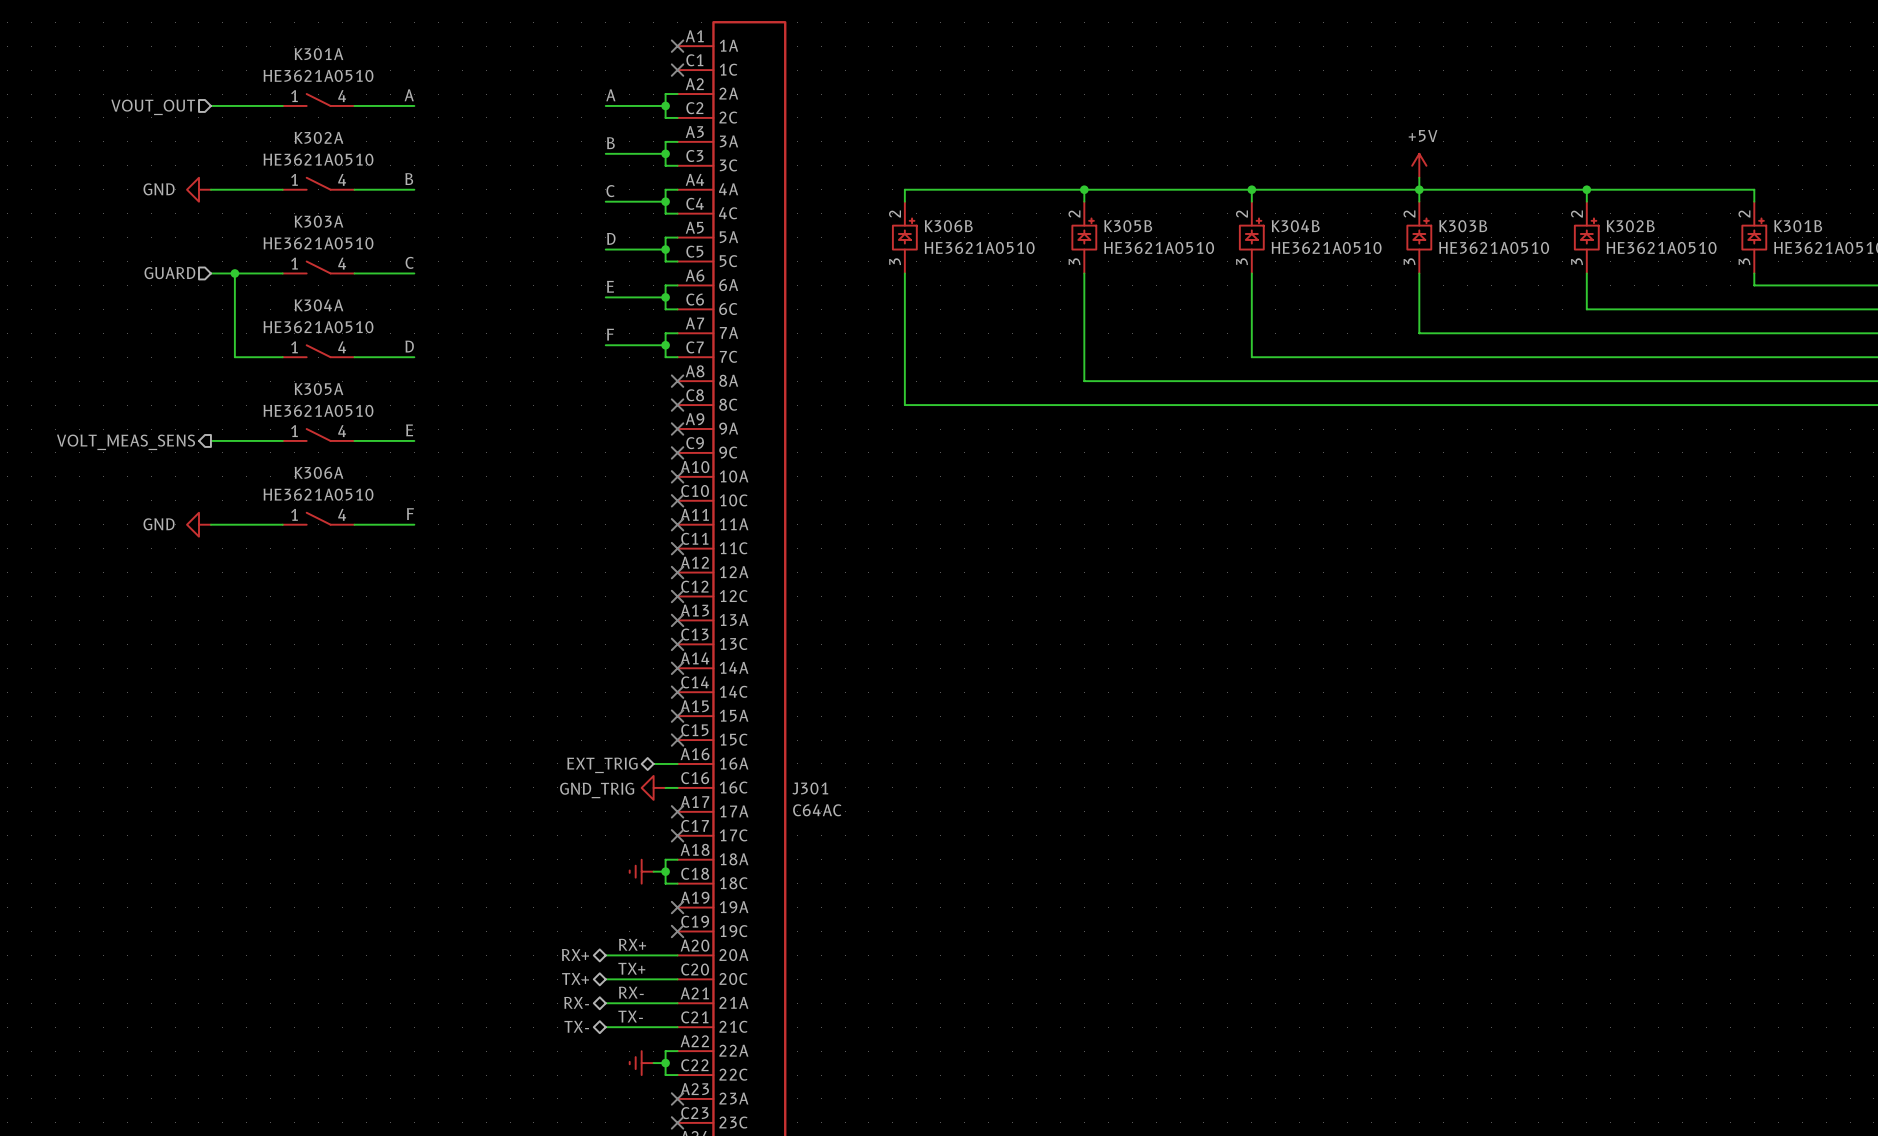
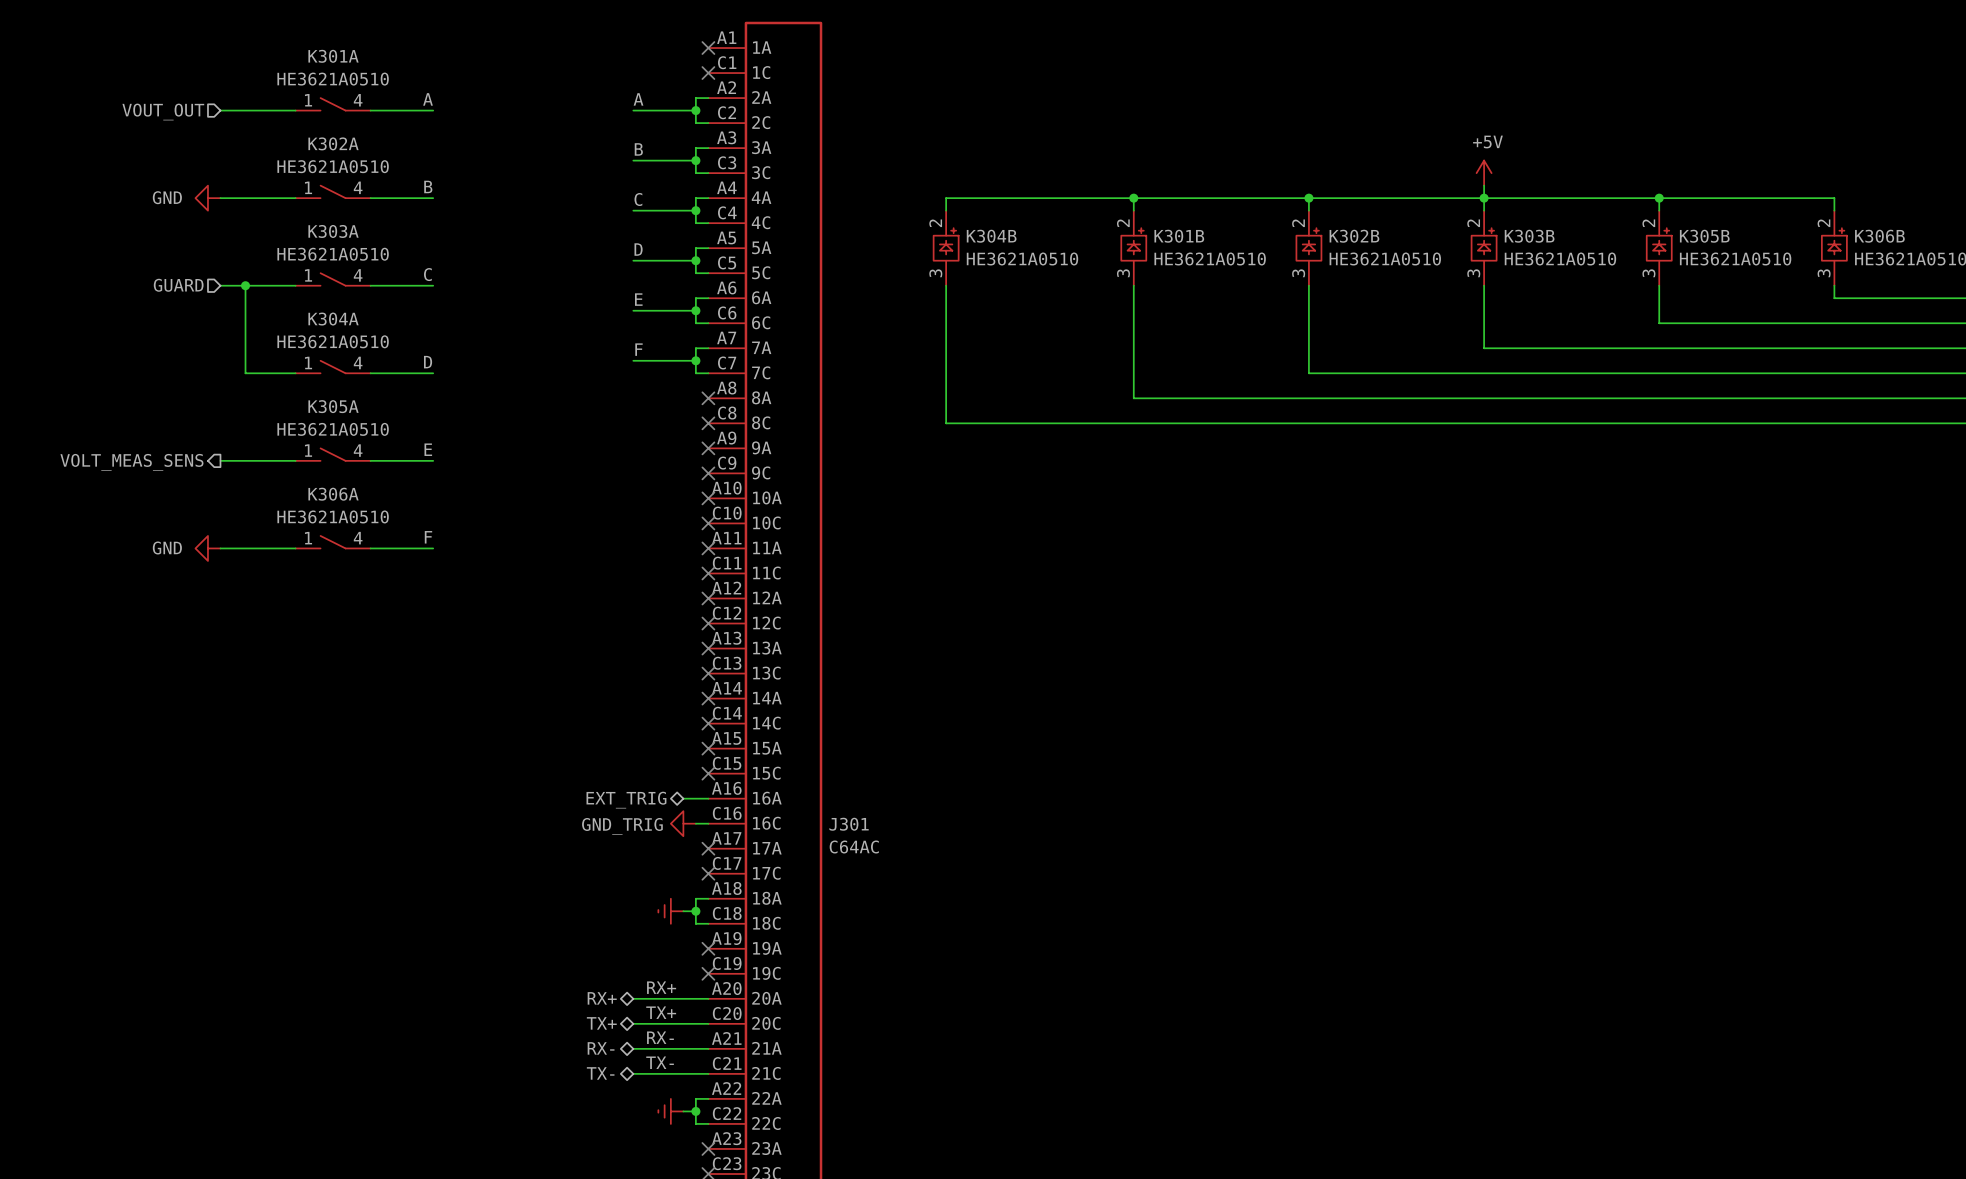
K306B name: K306B (948, 226) -> K304B (991, 236)
K305B name: K305B (1128, 226) -> K301B (1179, 236)
K304B name: K304B (1295, 226) -> K302B (1354, 236)
K302B name: K302B (1630, 226) -> K305B (1704, 236)
K301B name: K301B (1798, 226) -> K306B (1879, 236)

